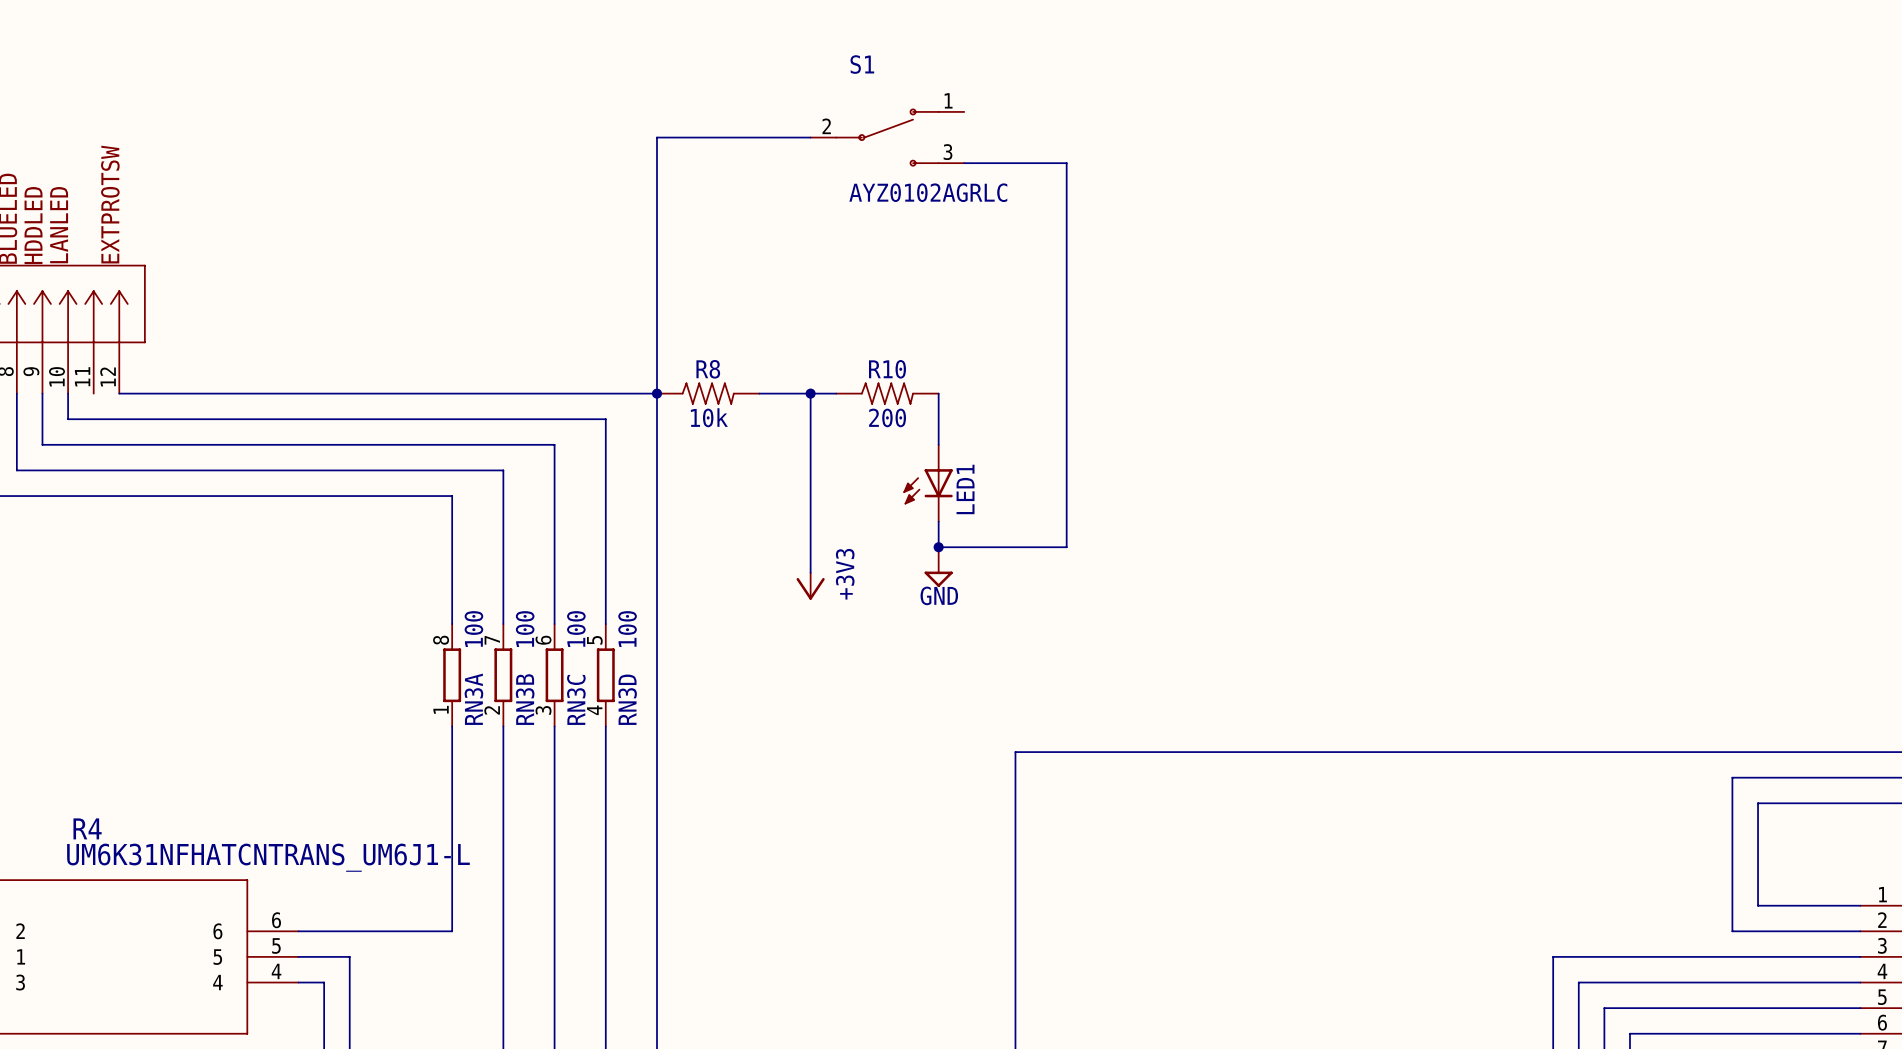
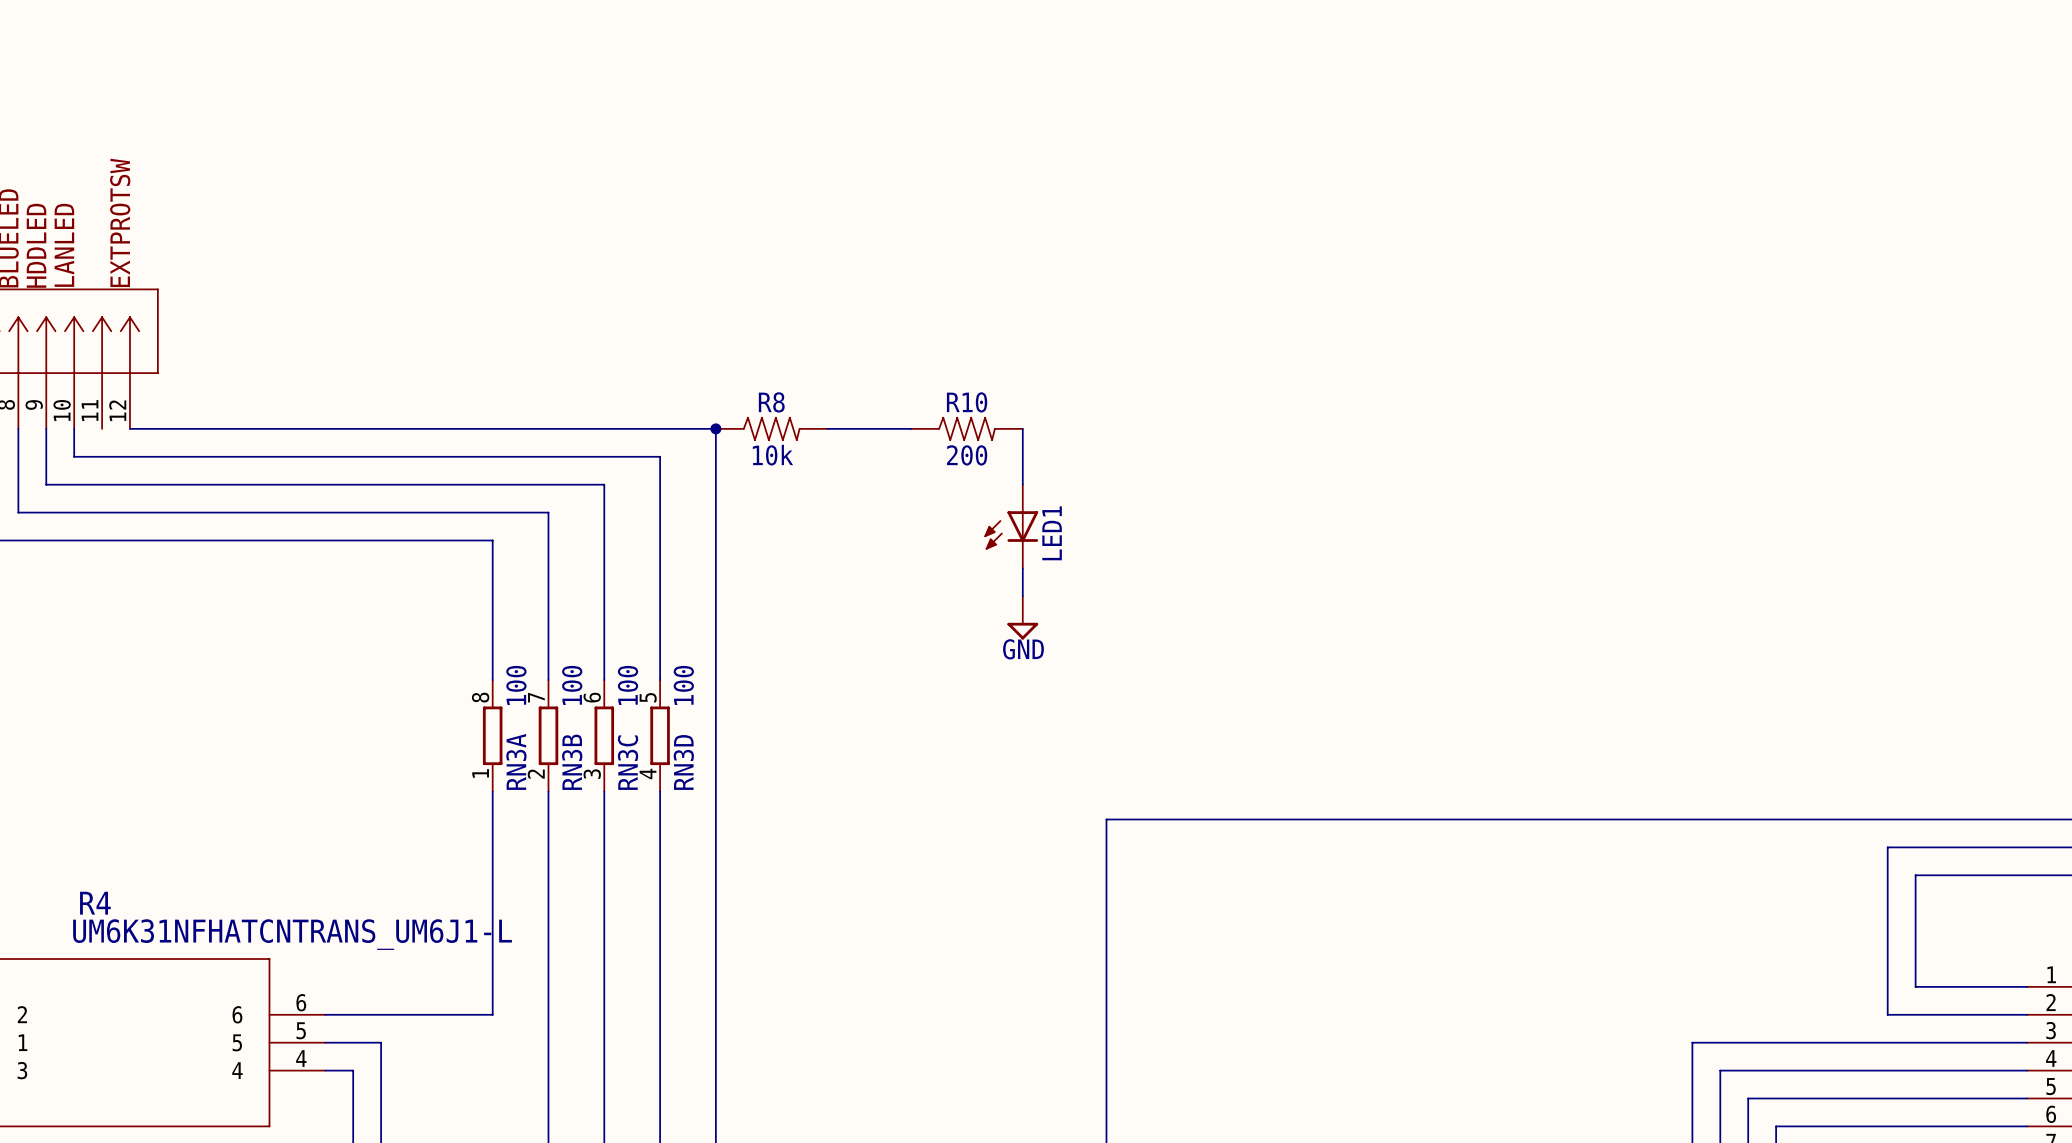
wire: (810, 137) (656, 137) (656, 393) -> none
S1: AYZ0102AGRLC (887, 137) -> none
wire: (964, 163) (1066, 163) (1066, 547) (938, 547) -> none
wire: (810, 393) (810, 572) -> none
junction: (810, 393) -> none
junction: (938, 547) -> none
power symbol: +3V3 (810, 586) -> none

